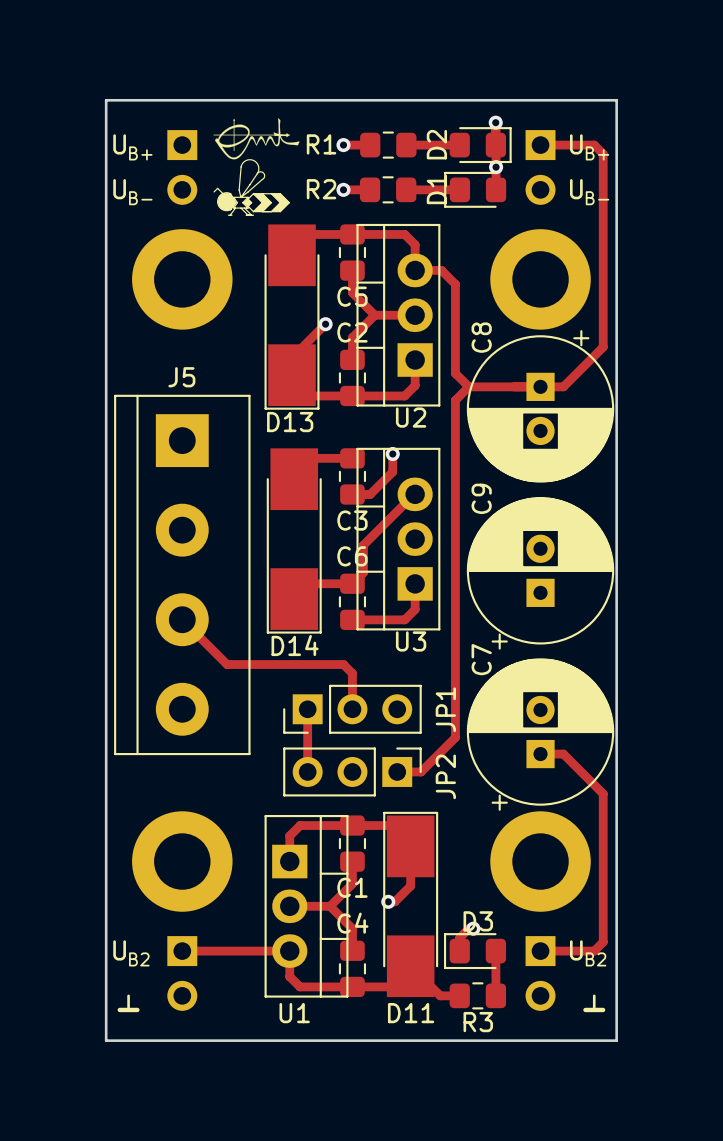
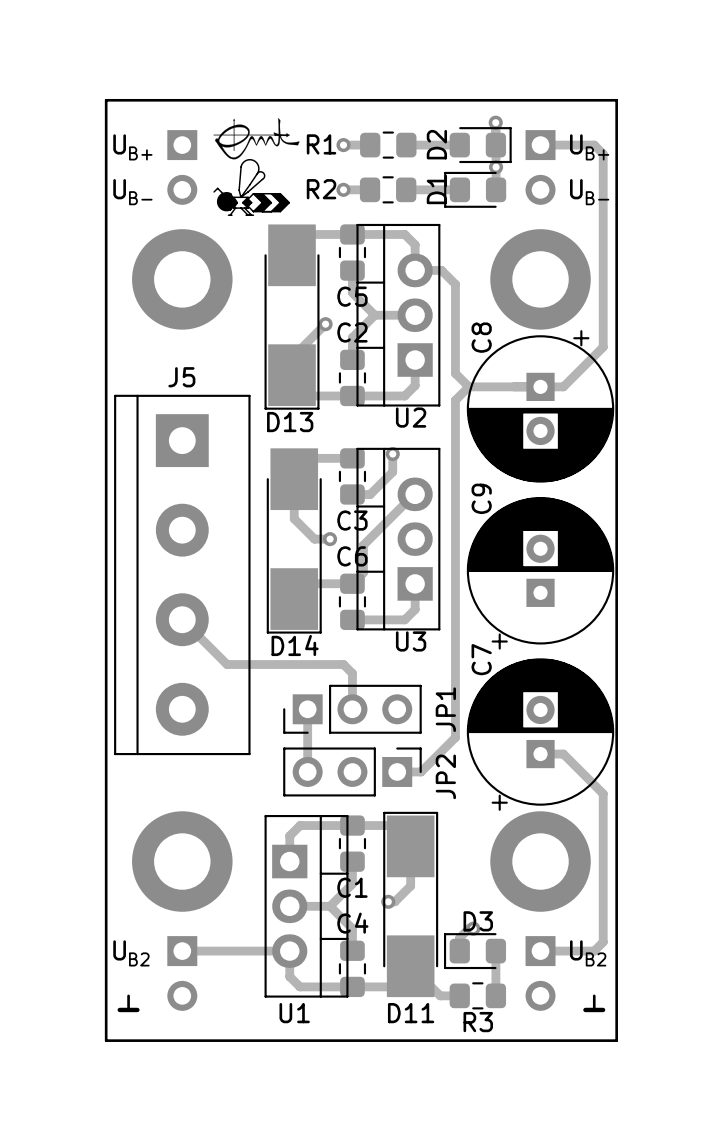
track: none -> (294, 479) (294, 518) (314, 539) (330, 539)
via: none -> (330, 539)

